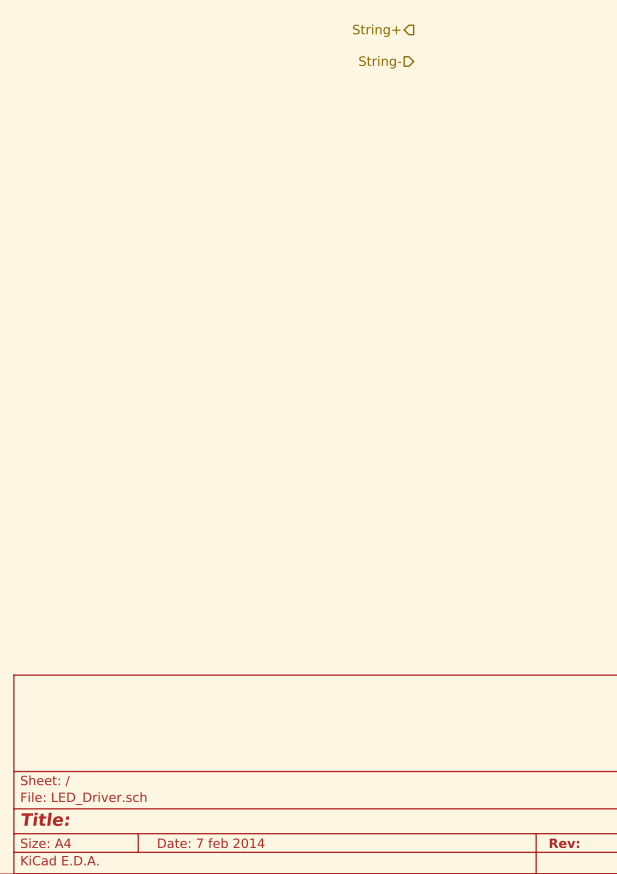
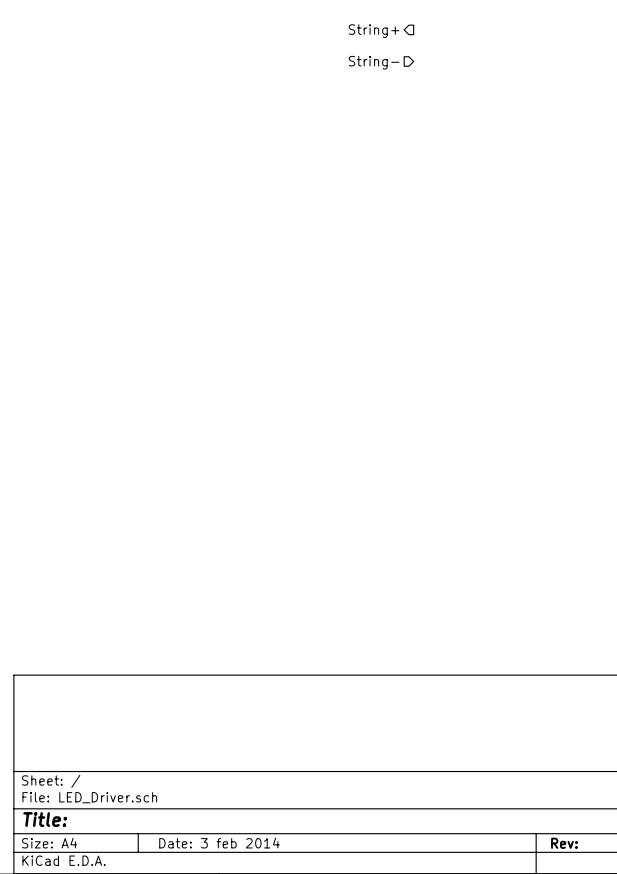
title block: Date: 7 feb 2014 (211, 843) -> Date: 3 feb 2014 (219, 843)

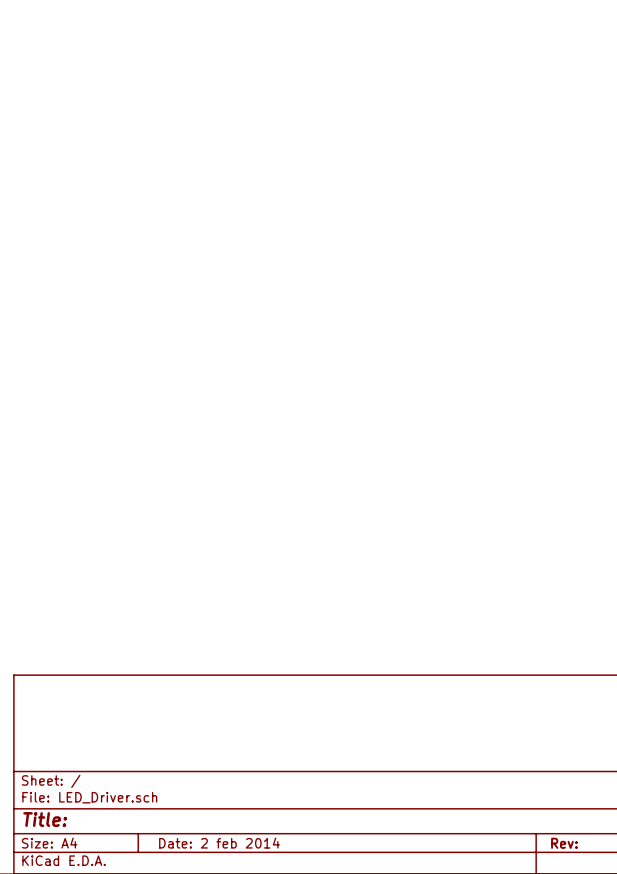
hierarchical label: String+ (374, 31) -> none
hierarchical label: String- (374, 62) -> none
title block: Date: 3 feb 2014 (219, 843) -> Date: 2 feb 2014 (219, 843)

